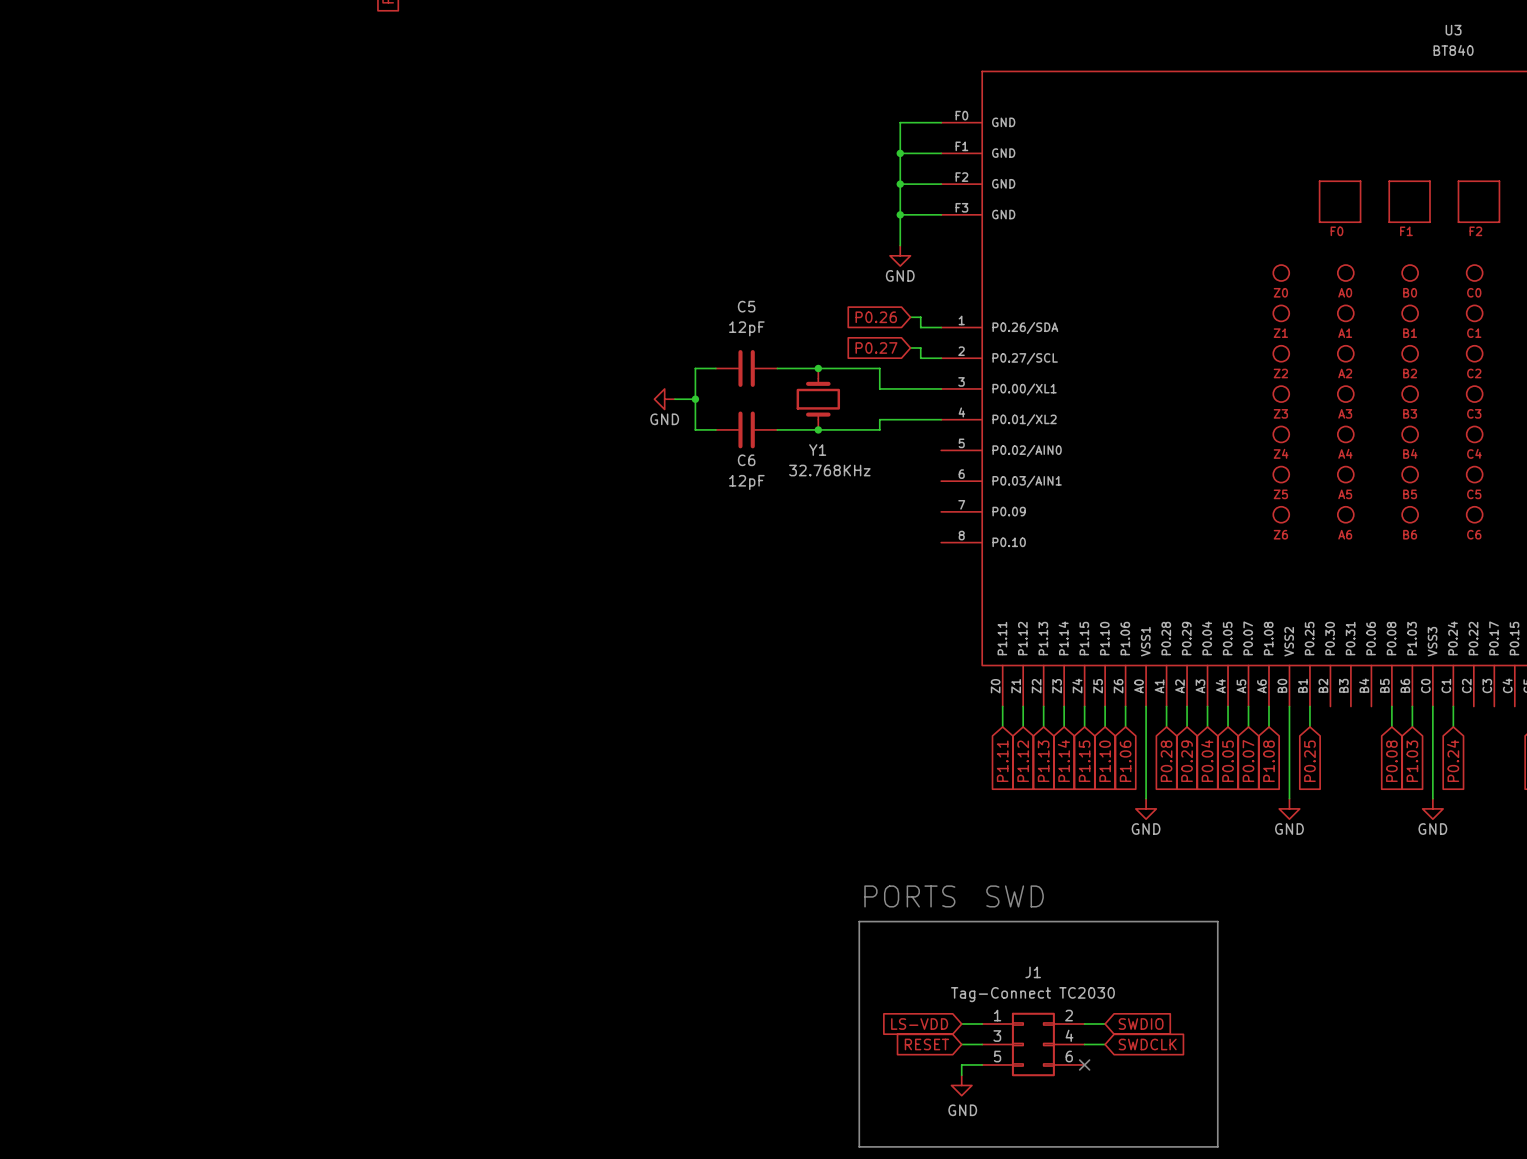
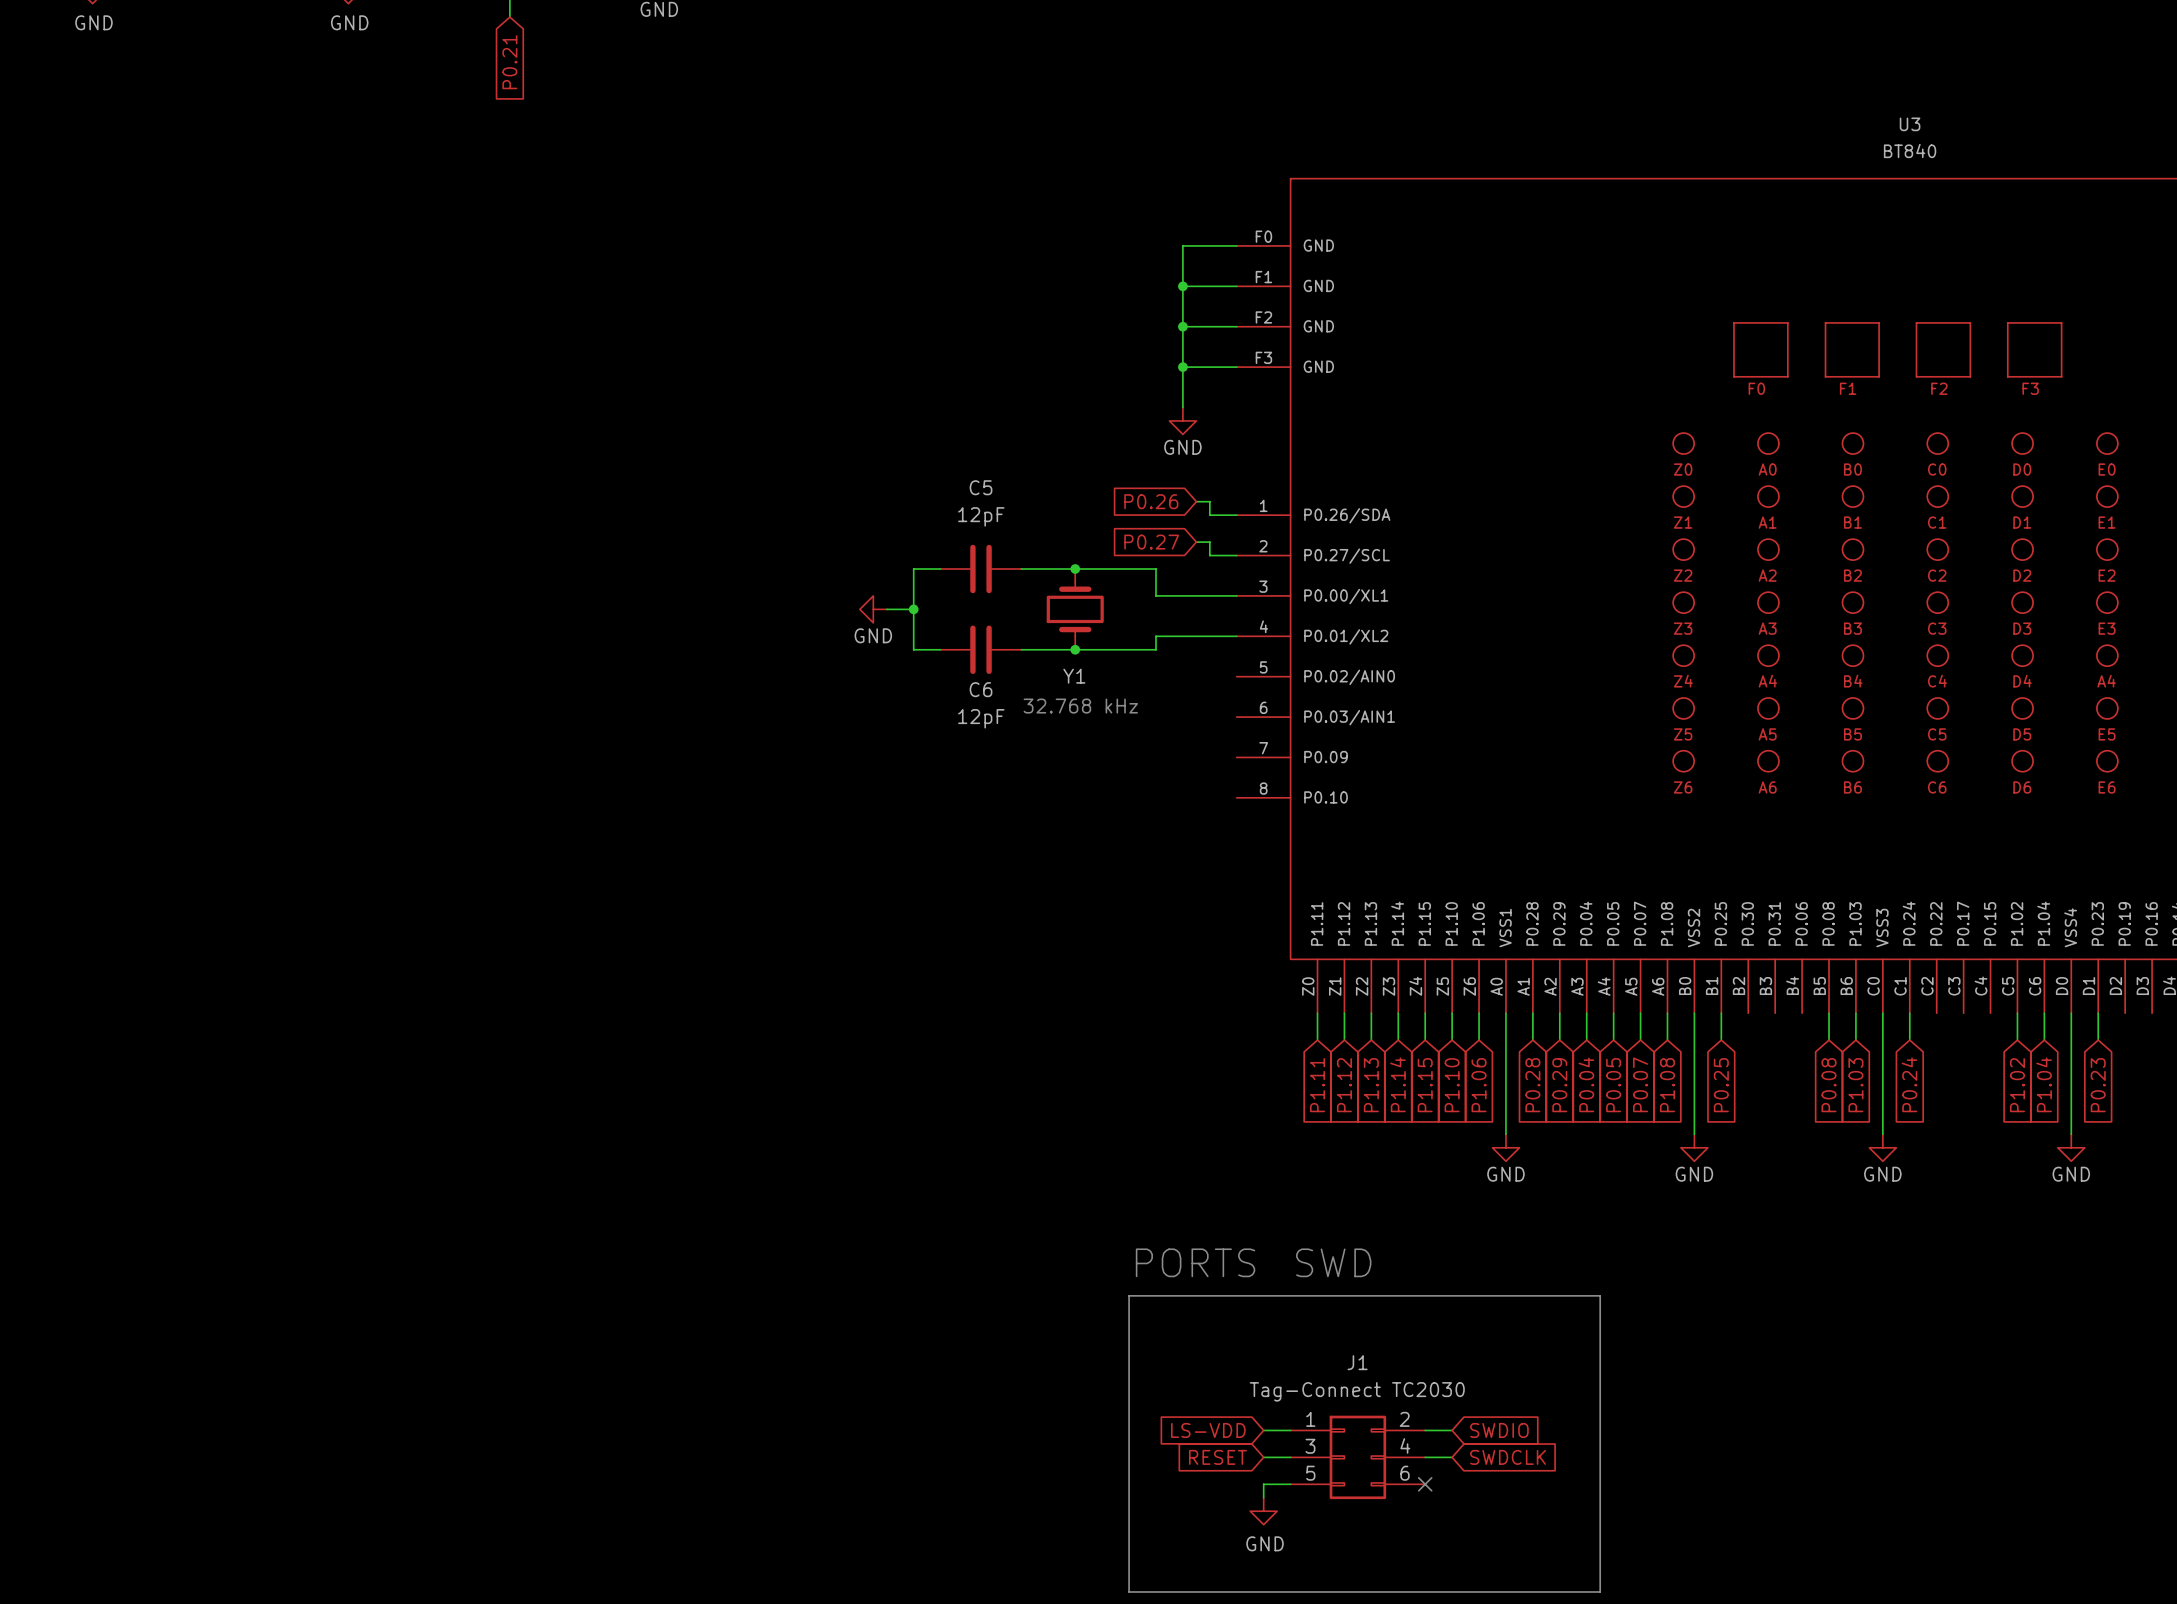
Y1 value: 32.768KHz (829, 470) -> none
text: none -> 32.768 kHz (1080, 706)

